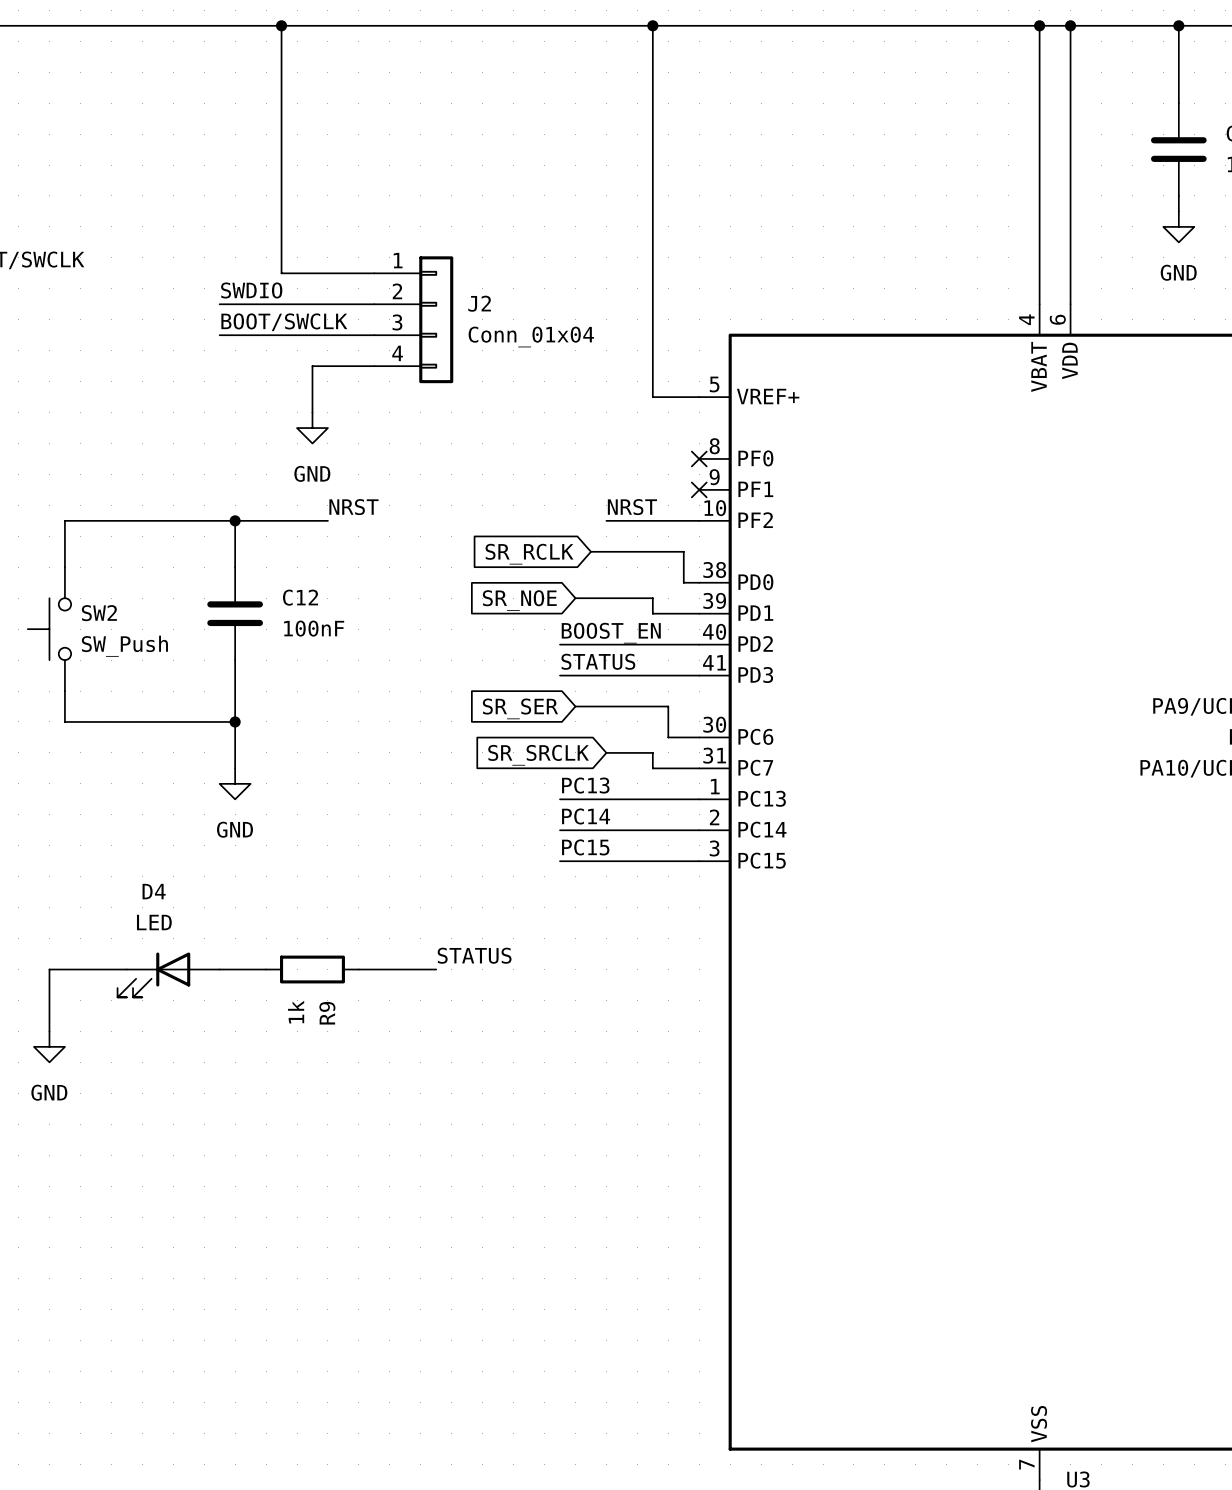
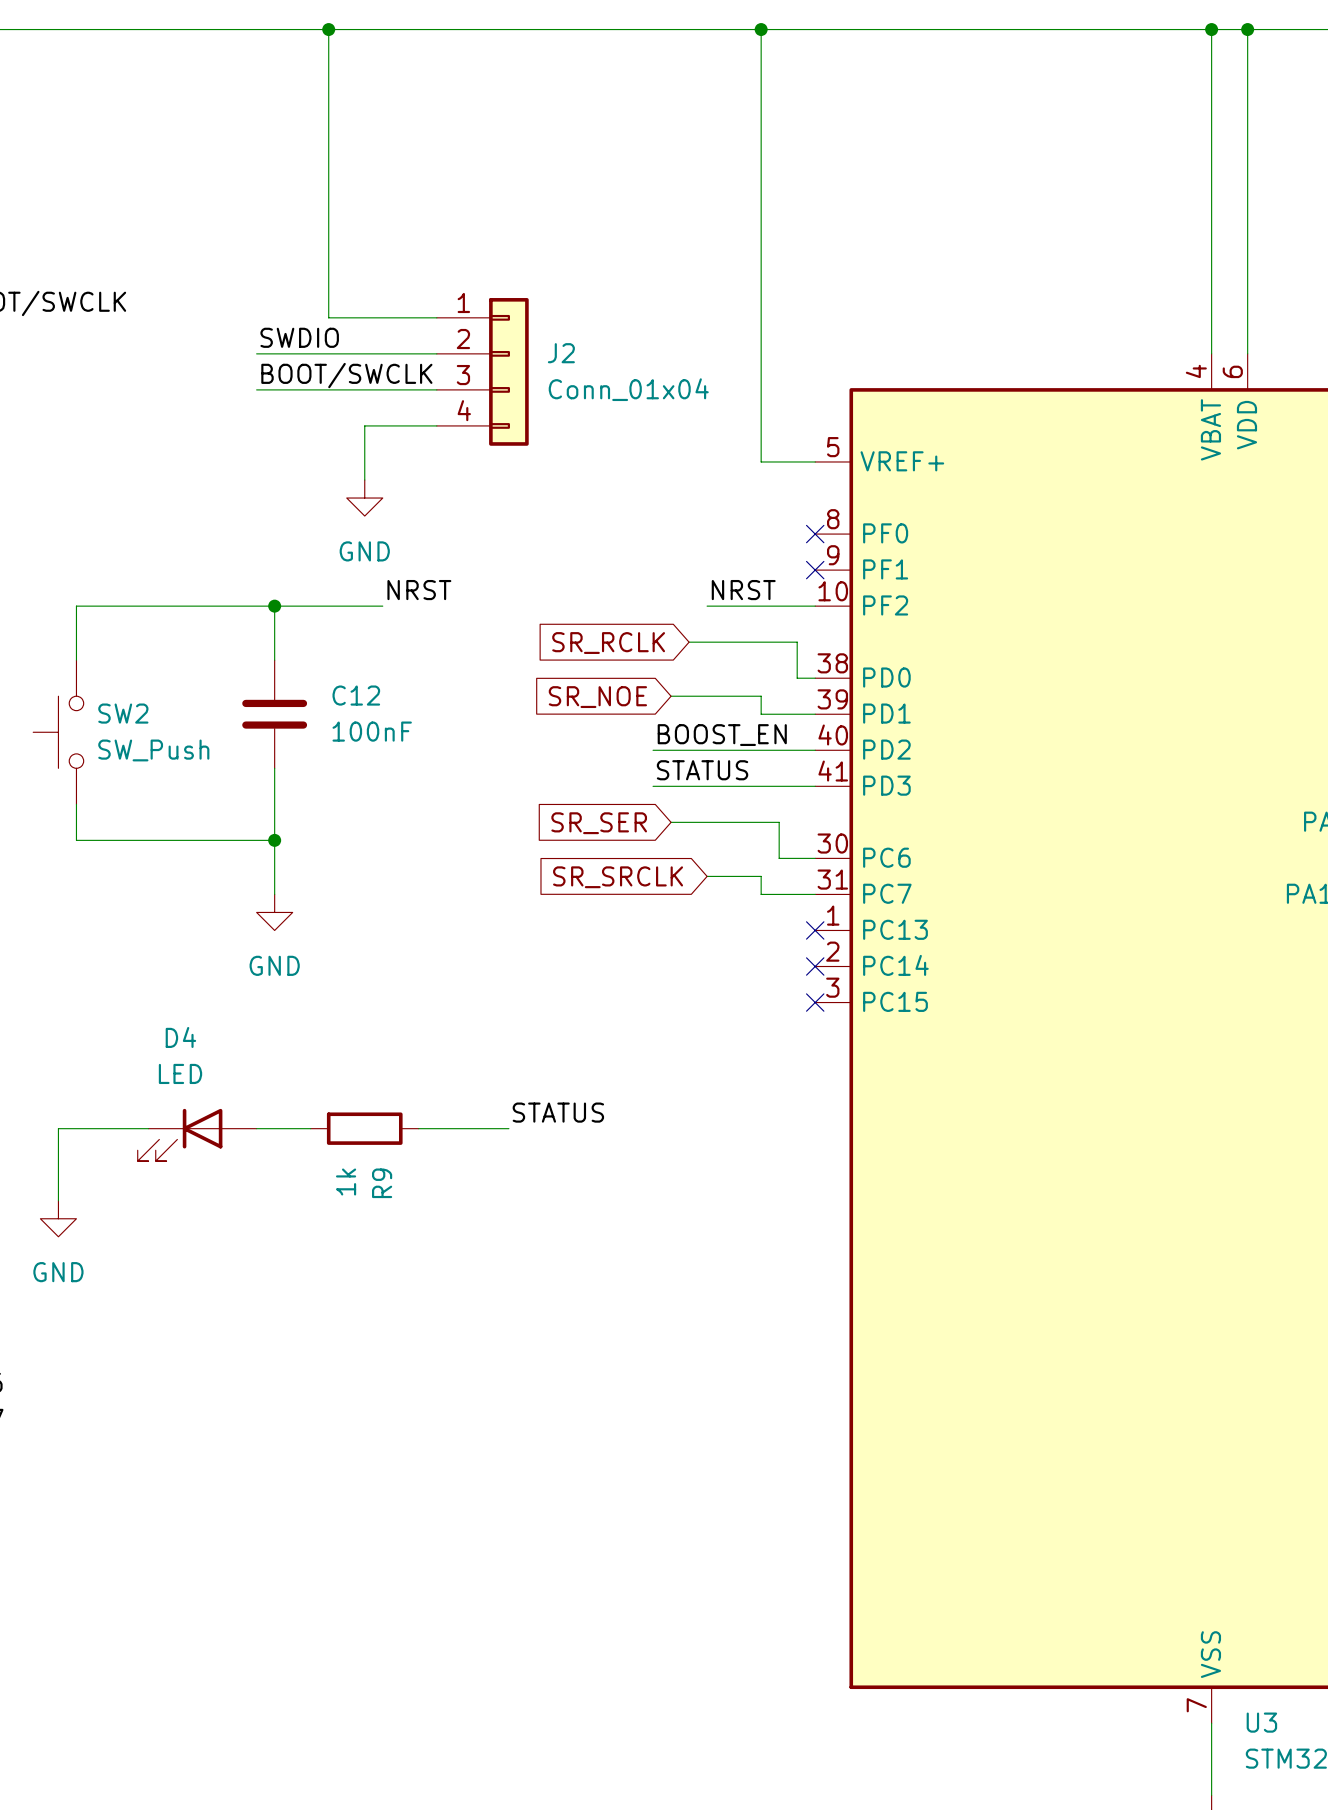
label: PC13 (585, 785) -> none
wire: (560, 799) (699, 799) -> none
no-connect mark: none -> (815, 930)
label: PC14 (586, 816) -> none
wire: (560, 830) (699, 830) -> none
no-connect mark: none -> (815, 966)
label: PC15 (585, 847) -> none
wire: (560, 861) (699, 861) -> none
no-connect mark: none -> (815, 1002)

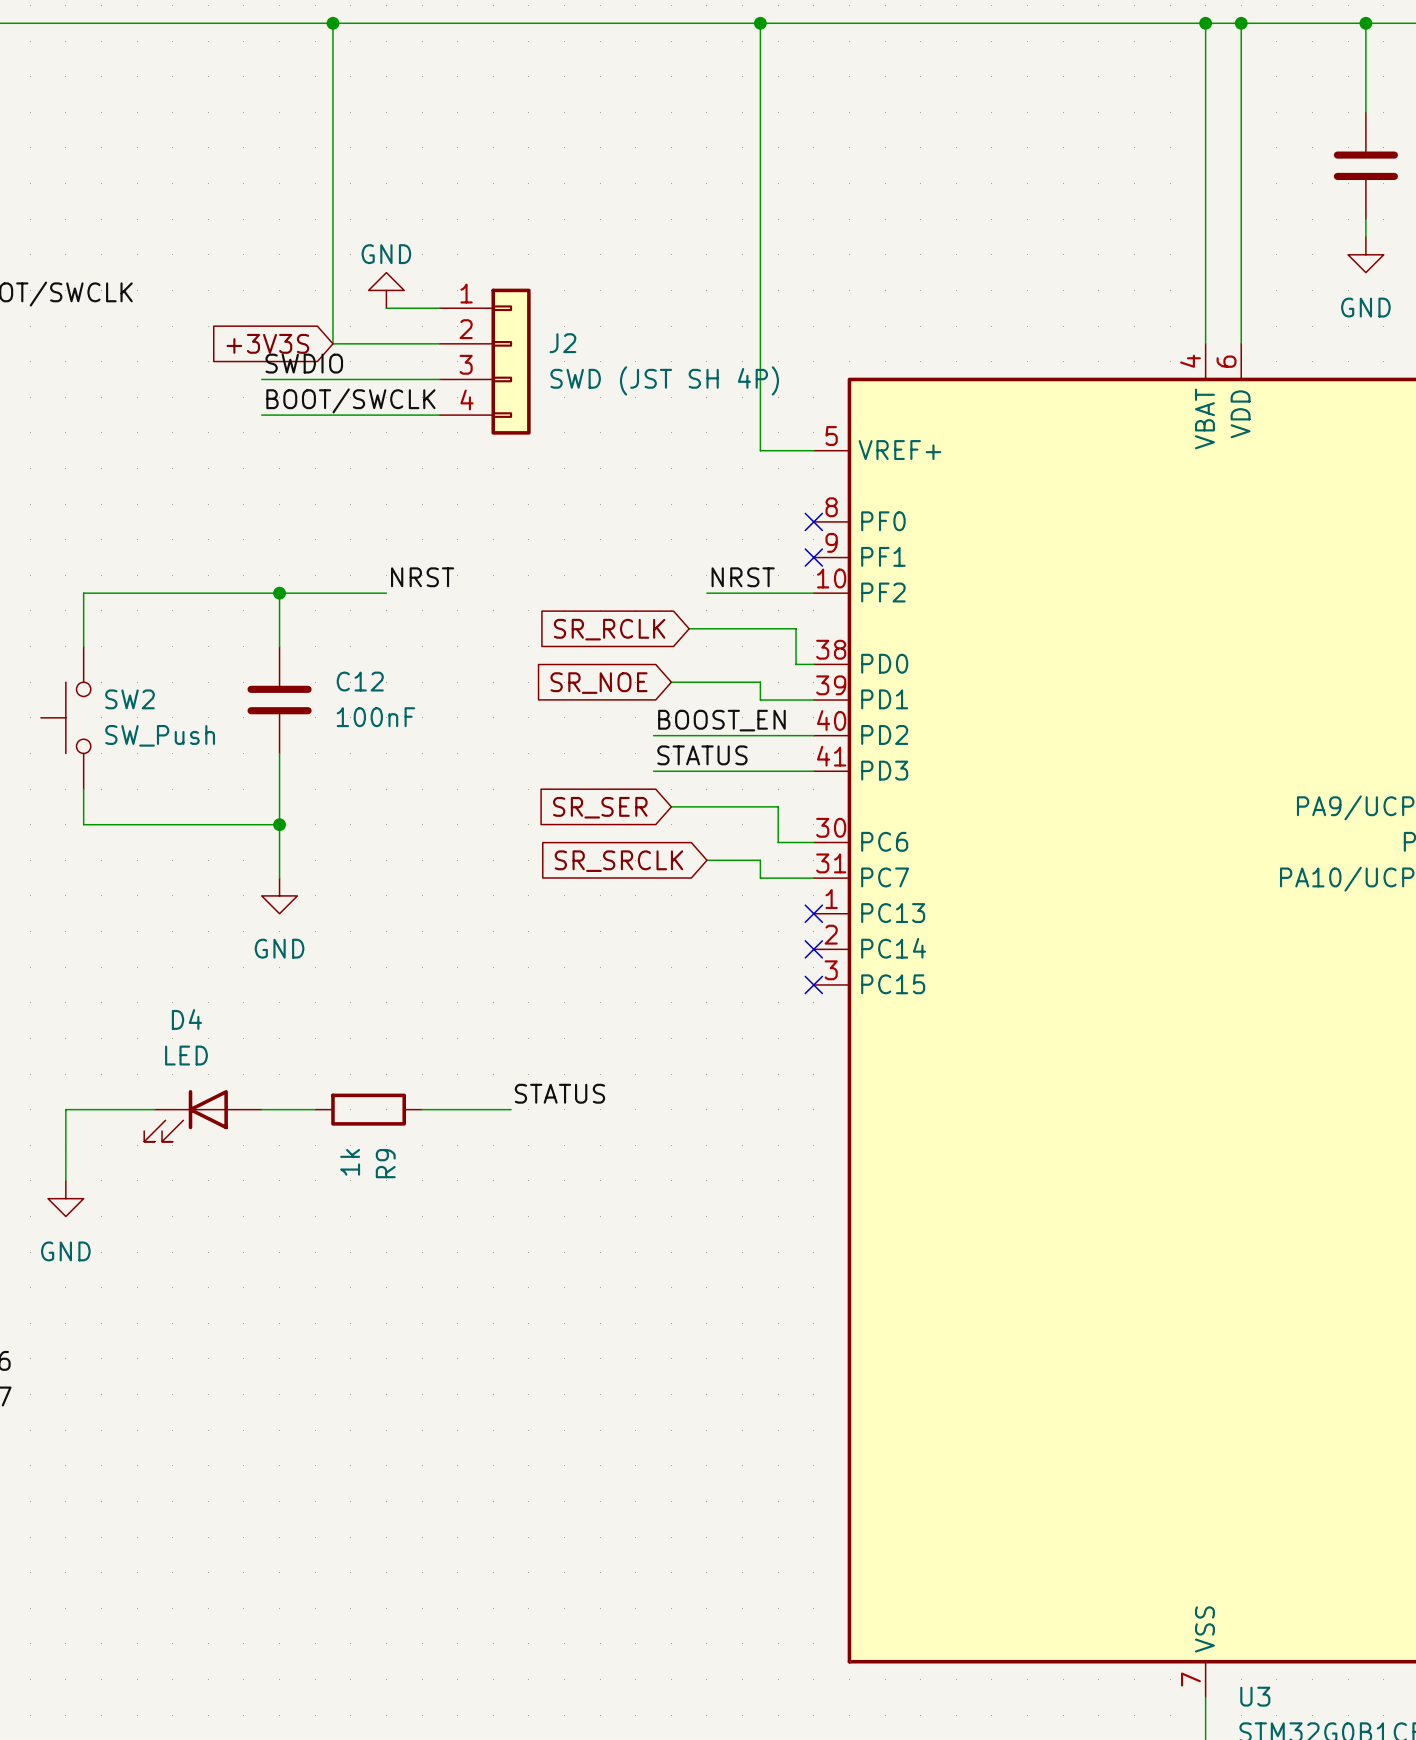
wire: (328, 317) (382, 317) -> (332, 308) (332, 343)
label: SWDIO (299, 337) -> none
wire: (256, 353) (328, 353) -> none
global label: none -> +3V3S (267, 343)
label: BOOT/SWCLK (346, 375) -> SWDIO (304, 363)
J2 value: Conn_01x04 (628, 389) -> SWD (JST SH 4P) (664, 380)
label: none -> BOOT/SWCLK (350, 400)
wire: (364, 425) (364, 480) -> (368, 415) (261, 415)
power symbol rotation: 0° (364, 498) -> 180° (386, 290)
power symbol position: GND (364, 498) -> GND (386, 290)

